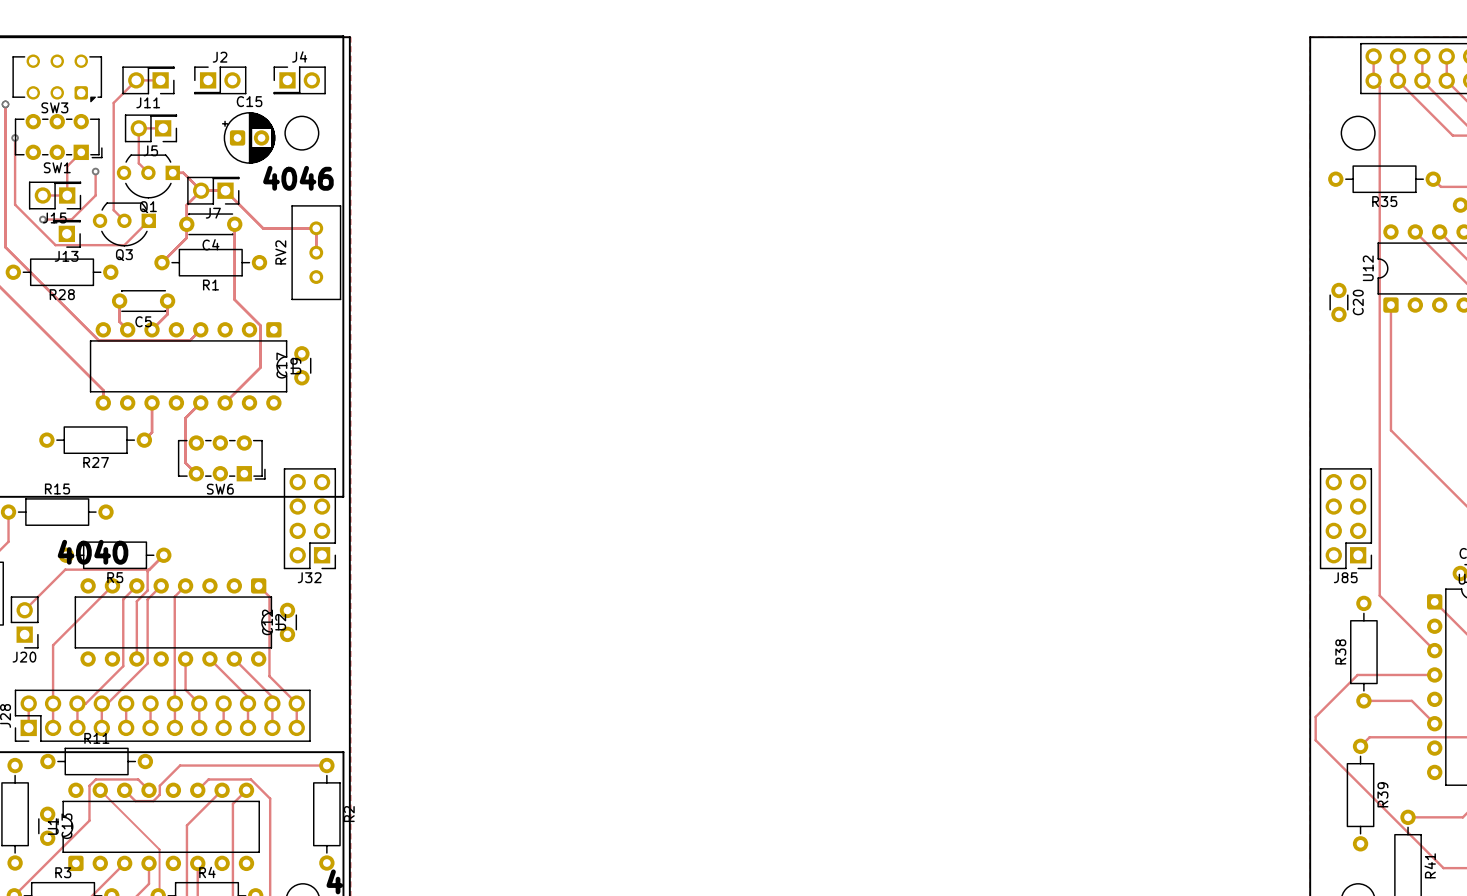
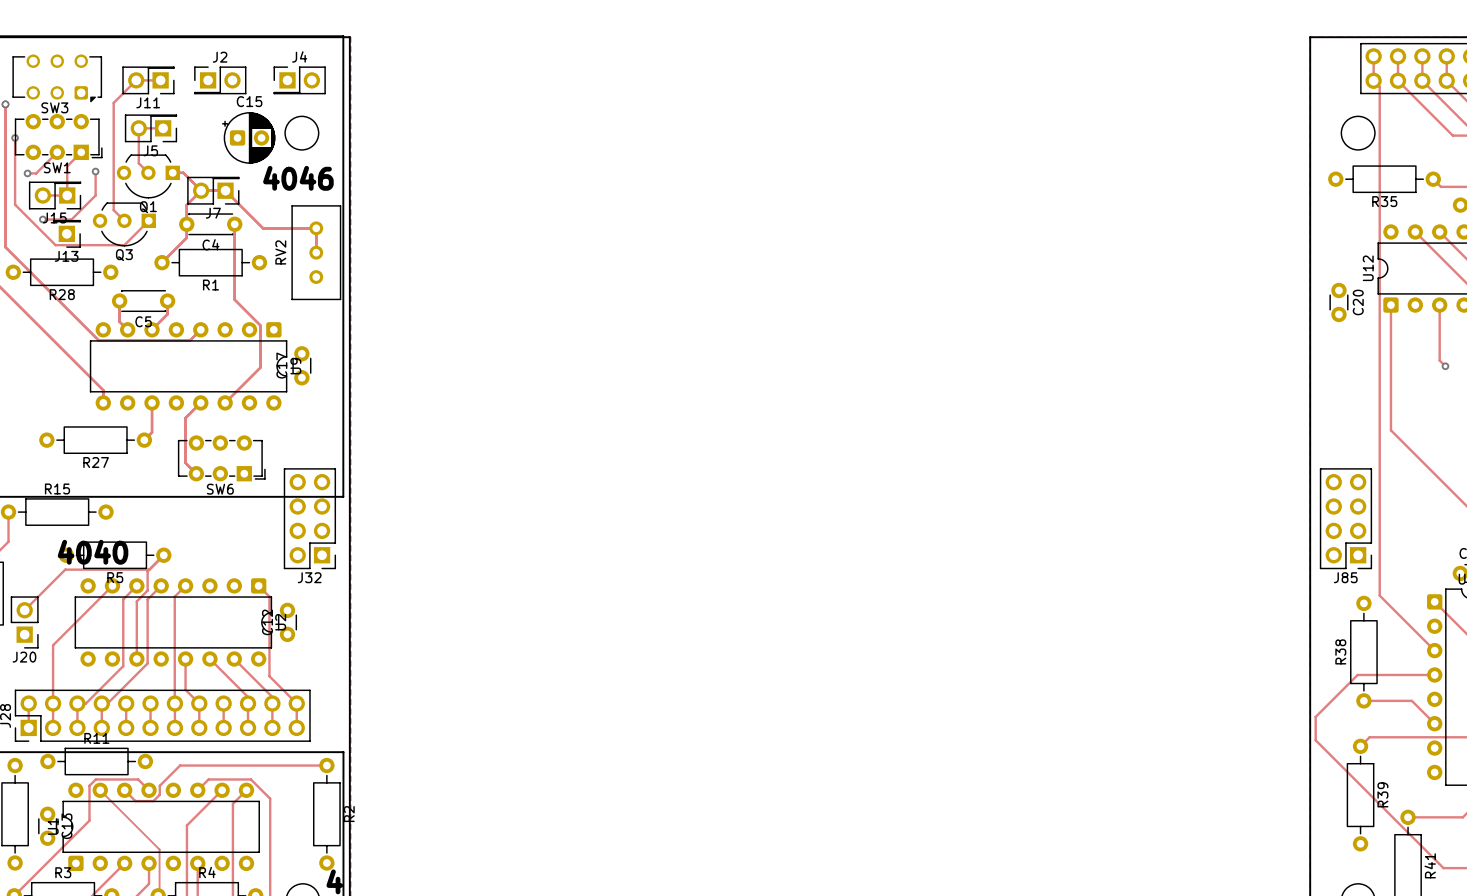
track: none -> (57, 152) (36, 173) (27, 173)
via: none -> (27, 173)
track: none -> (1439, 305) (1439, 360) (1445, 366)
via: none -> (1445, 366)

